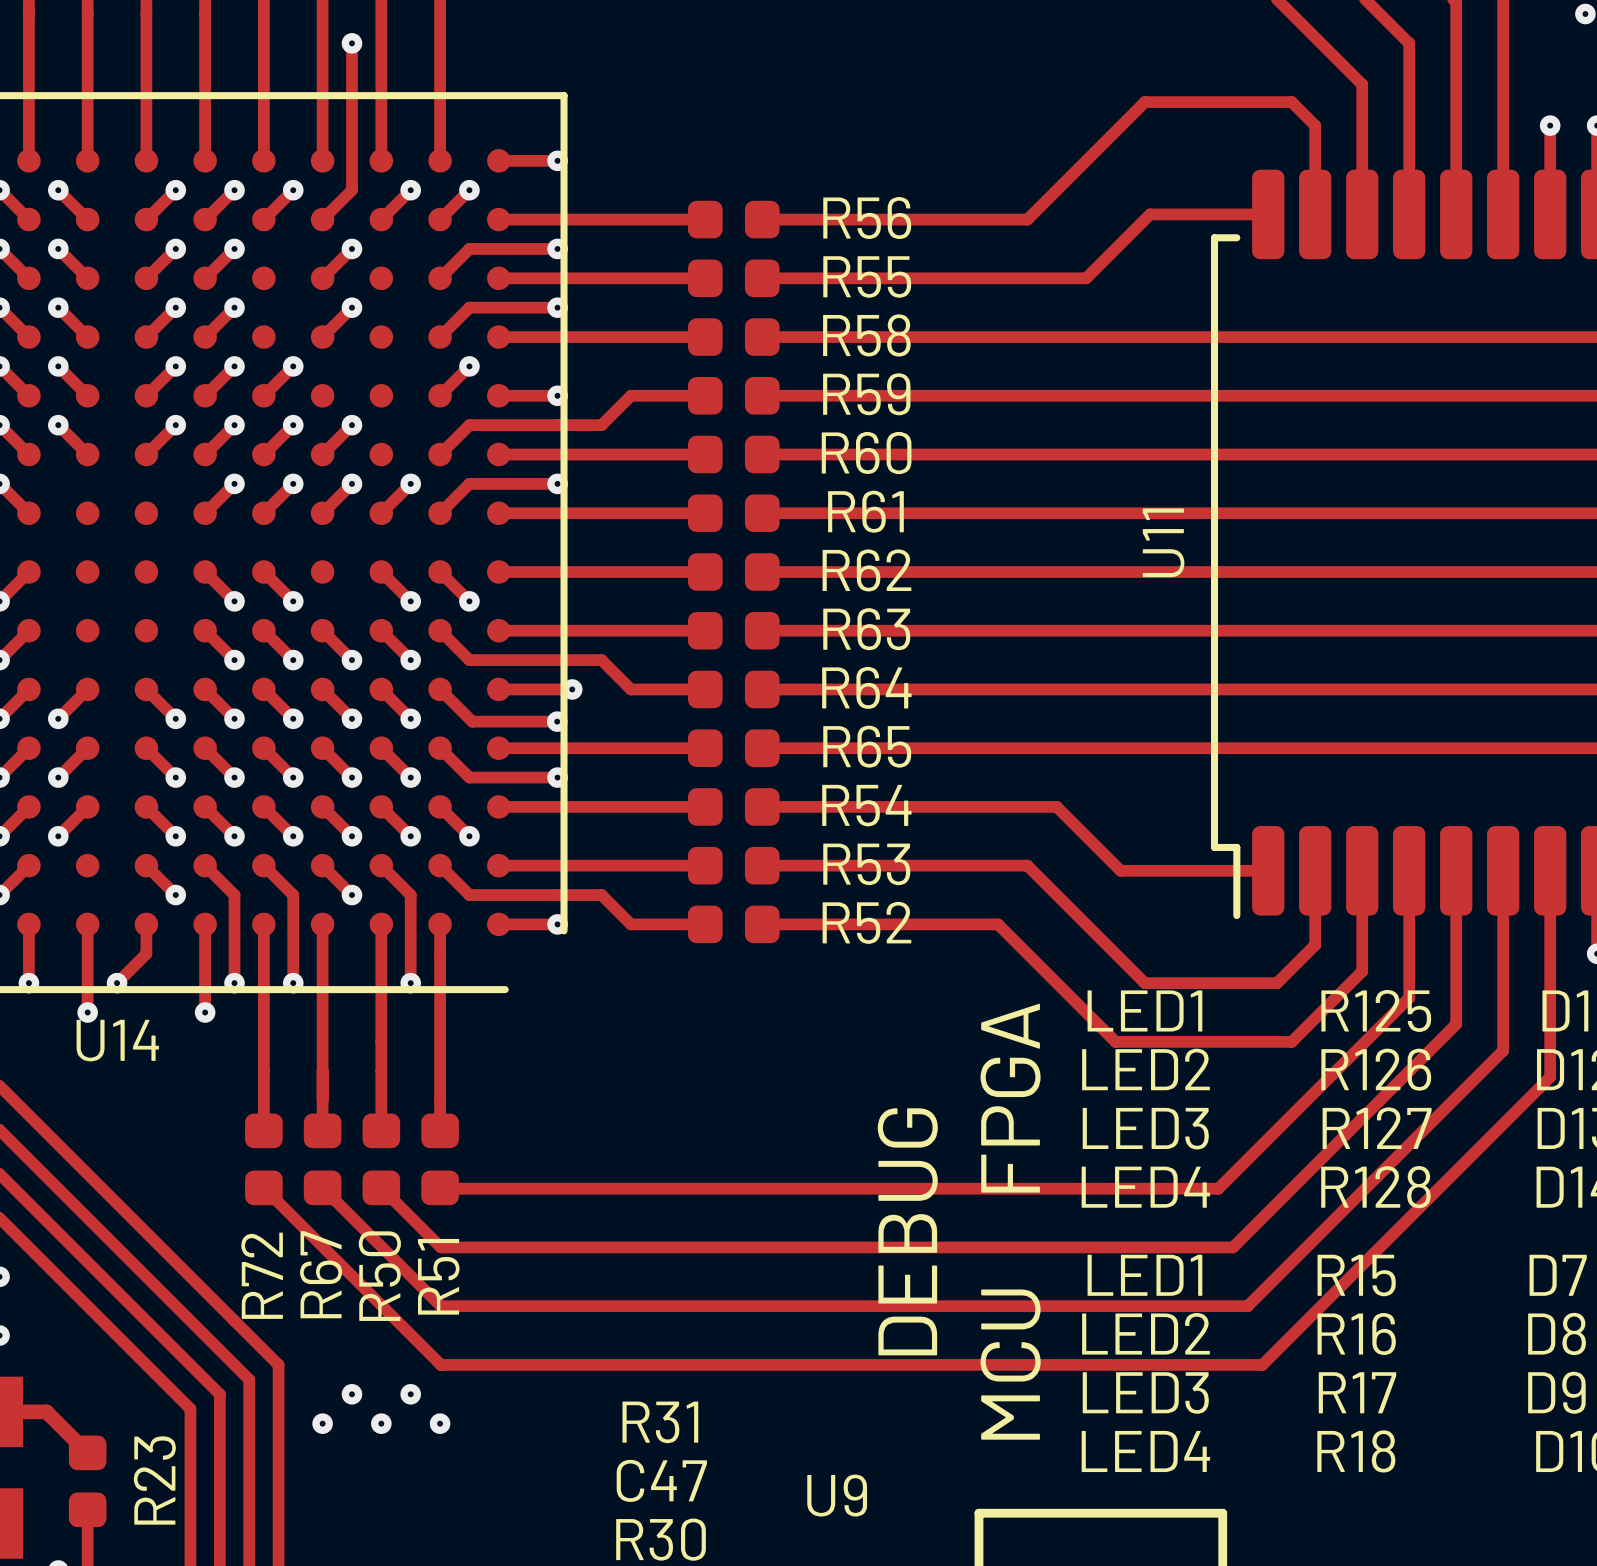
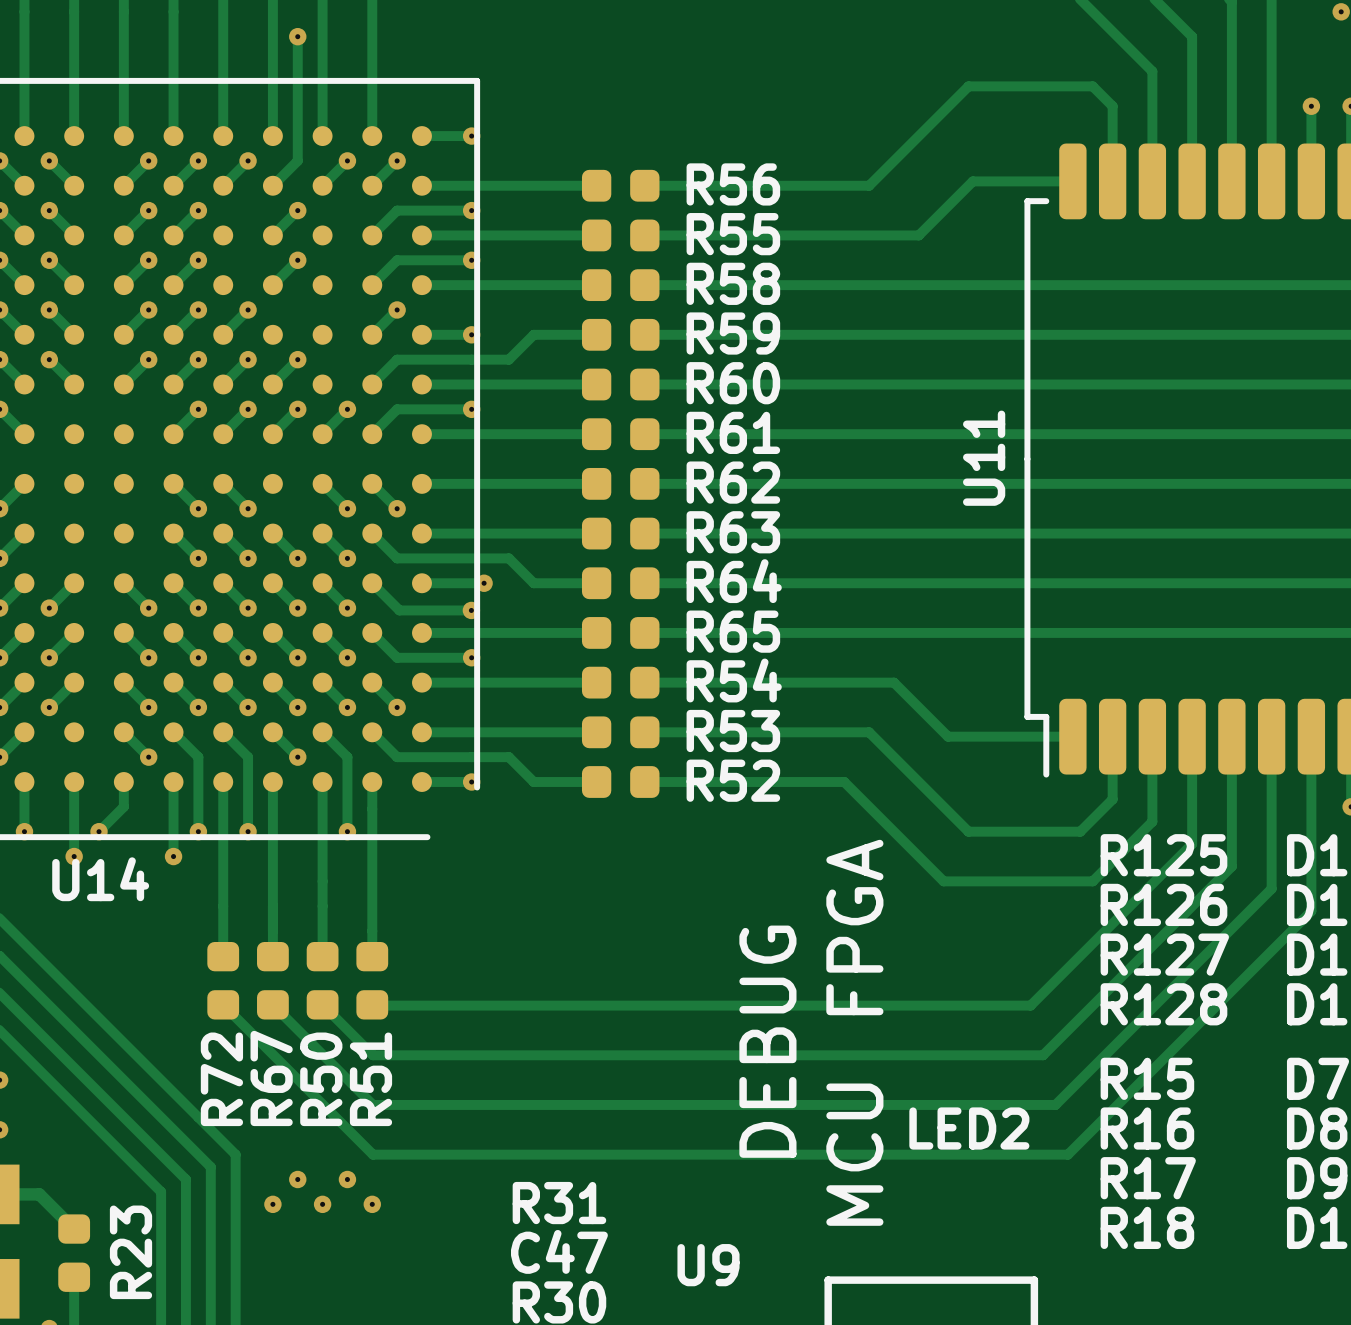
text: LED1 (1144, 1010) -> none
text: LED2 (1145, 1069) -> none
text: LED3 (1145, 1128) -> none
text: LED4 (1145, 1187) -> none
text: LED1 (1144, 1275) -> none
text: LED3 (1145, 1392) -> none
text: LED4 (1145, 1451) -> none

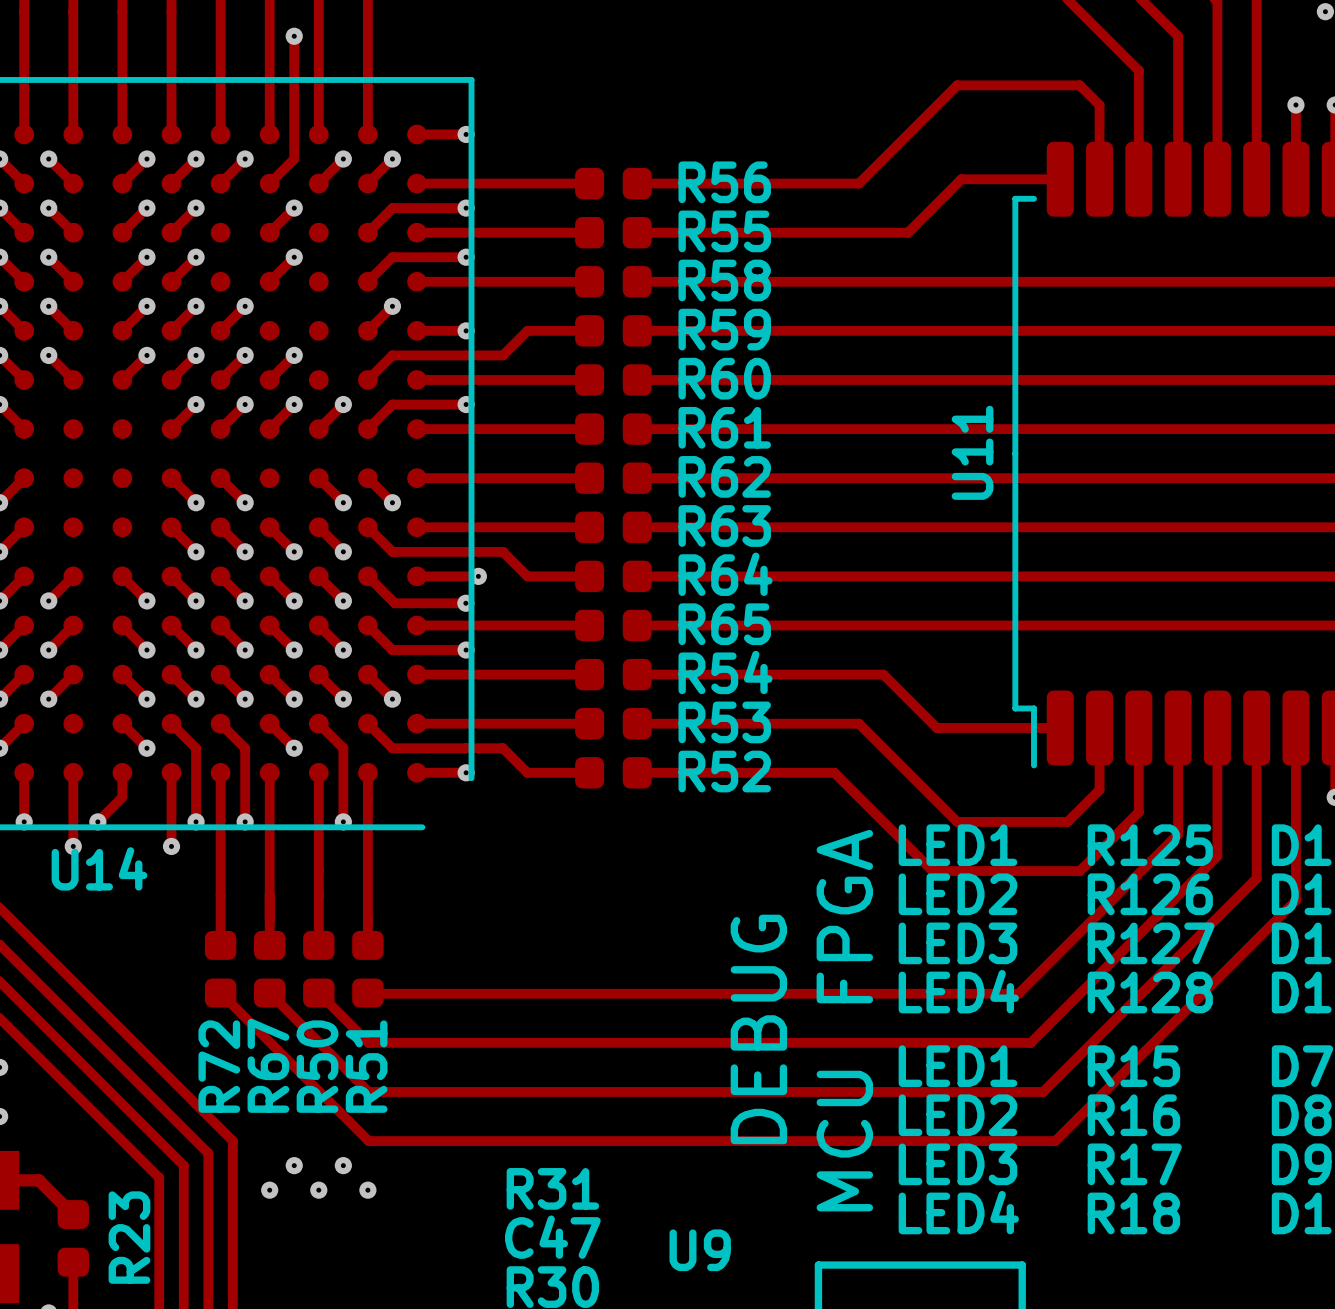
text: none -> LED1 (957, 845)
text: none -> LED2 (957, 894)
text: none -> LED3 (957, 943)
text: none -> LED4 (958, 991)
text: none -> LED1 (957, 1066)
text: none -> LED3 (957, 1164)
text: none -> LED4 (958, 1212)

